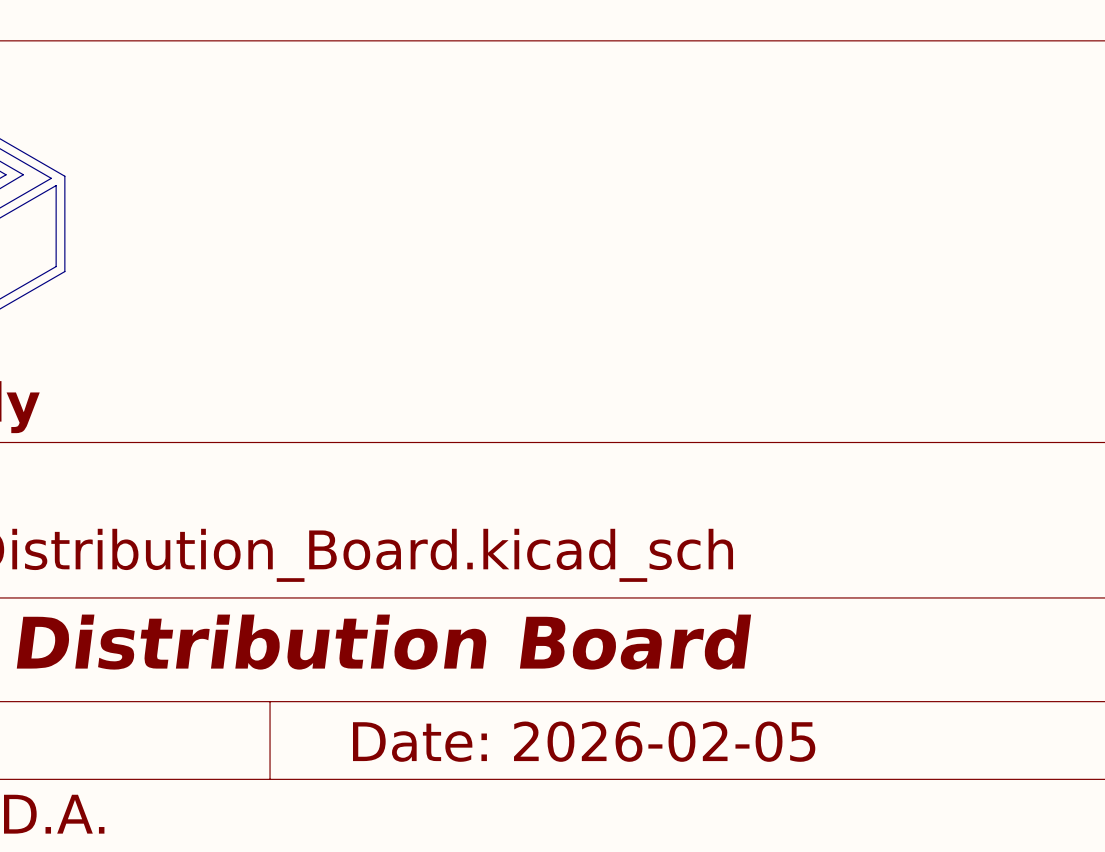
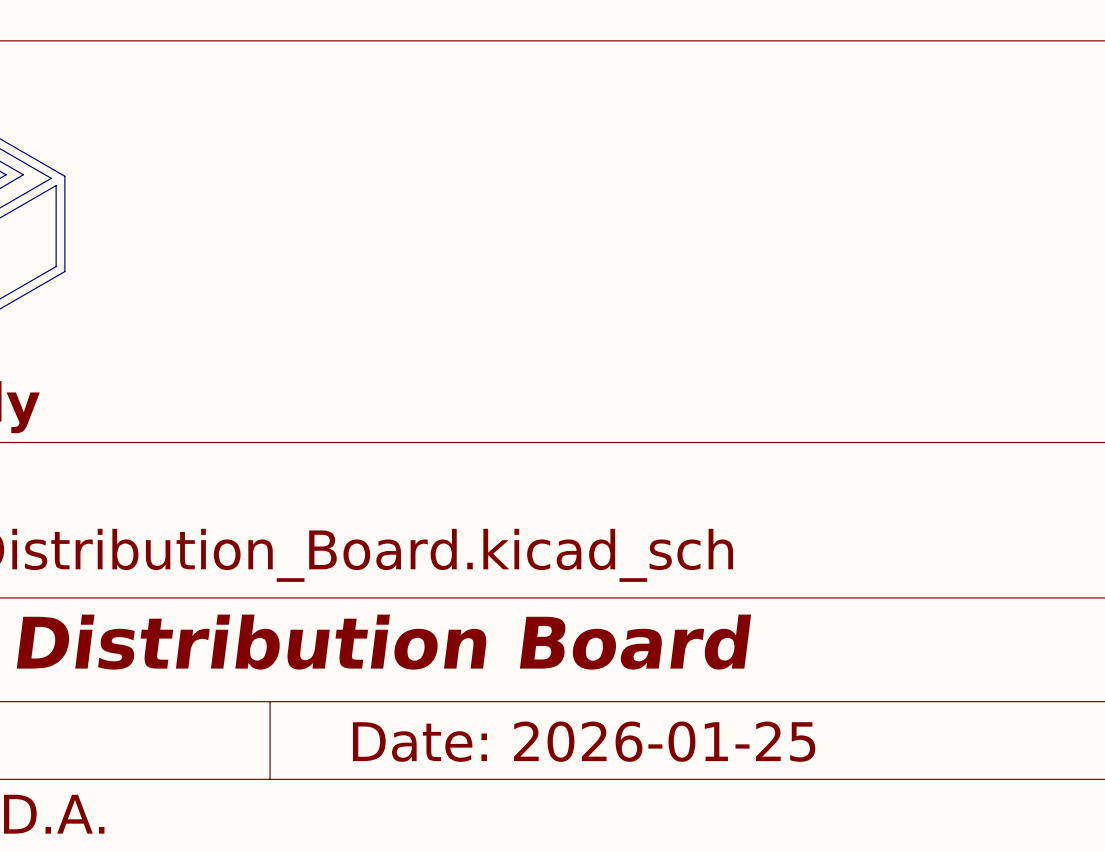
title block: Date: 2026-02-05 (584, 741) -> Date: 2026-01-25 (584, 741)

